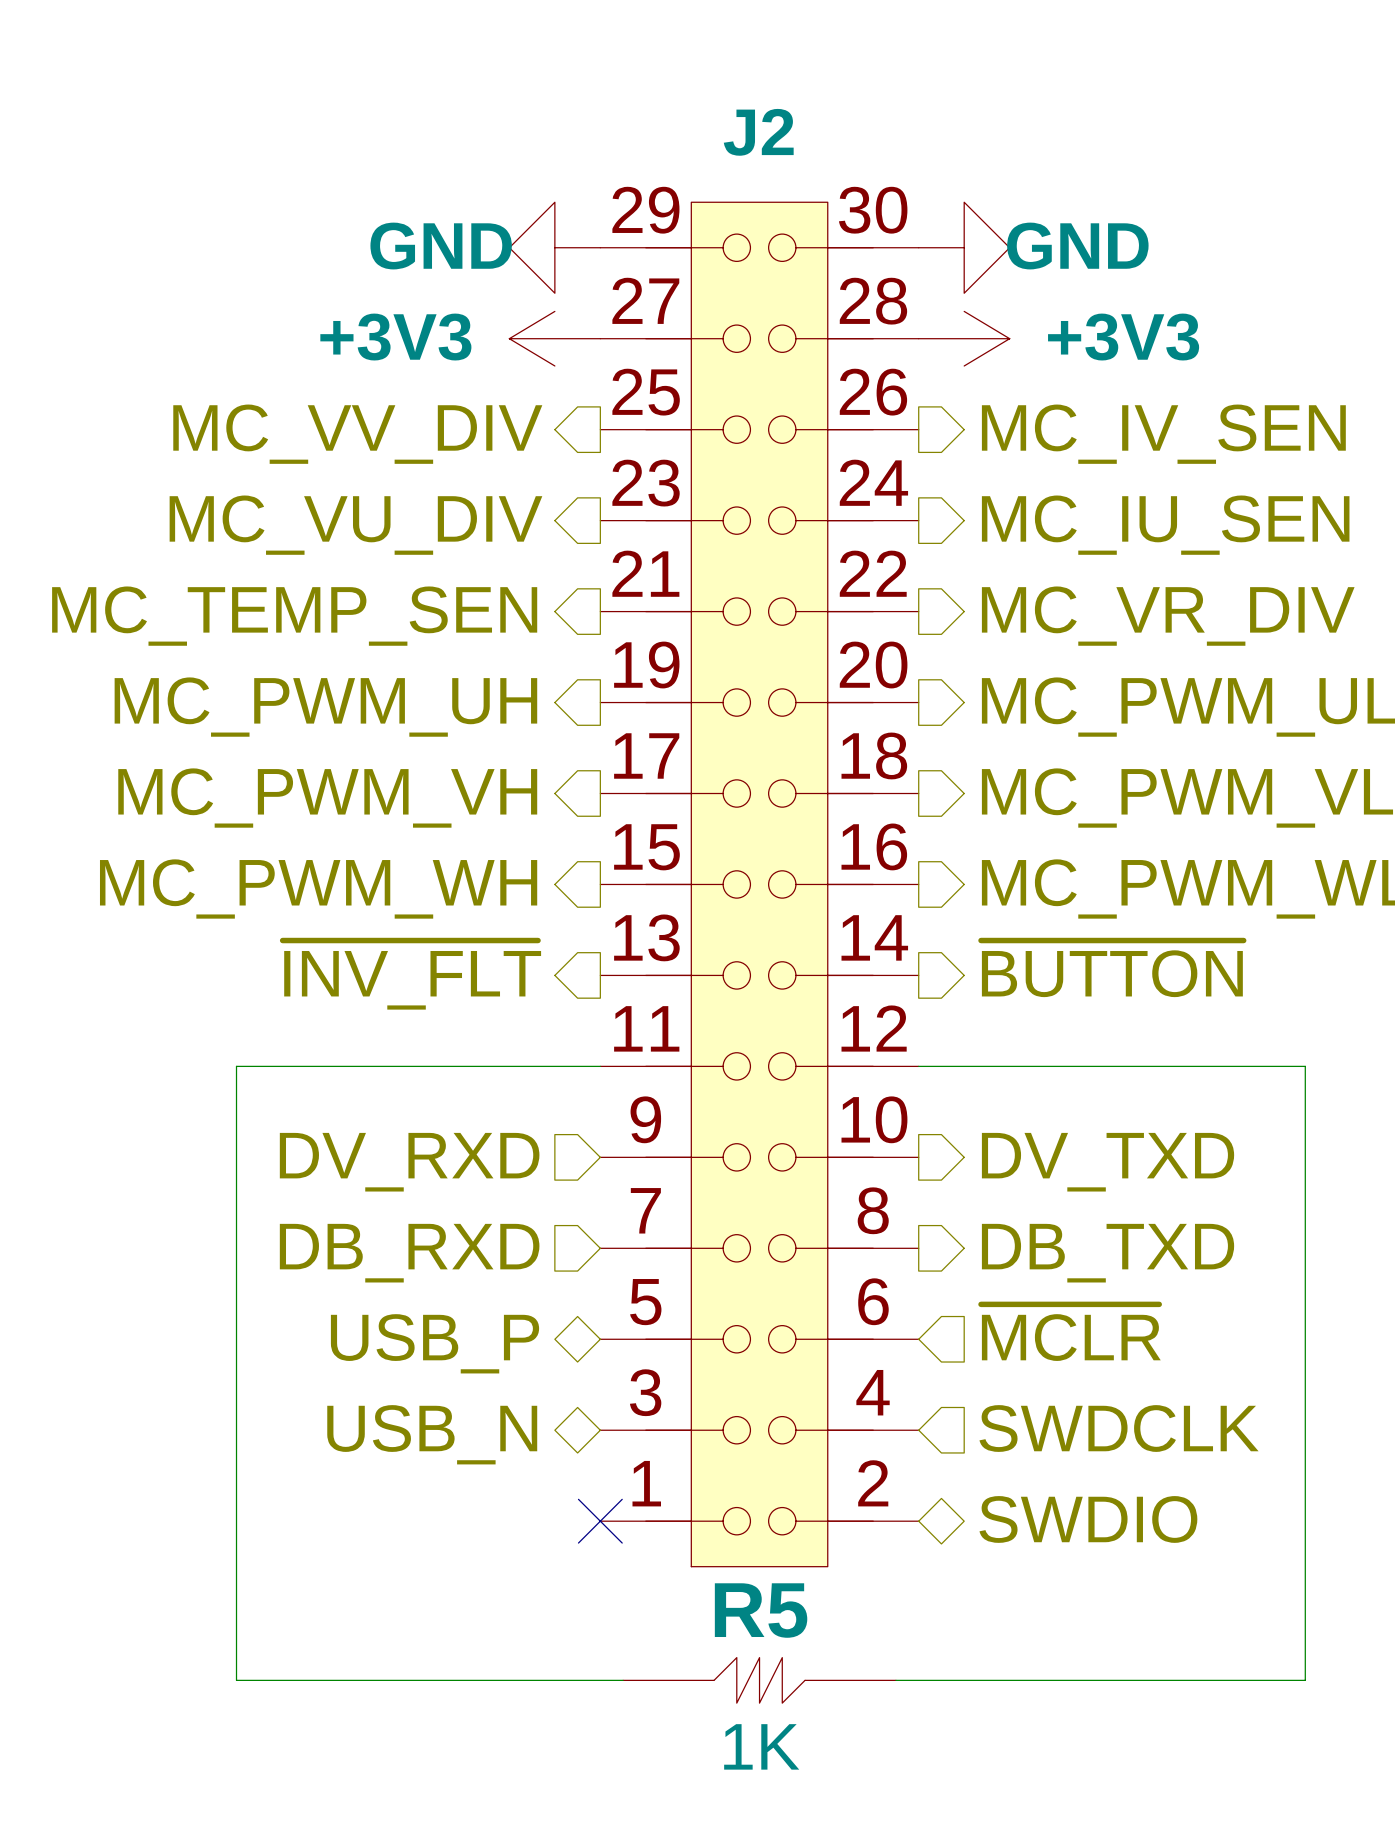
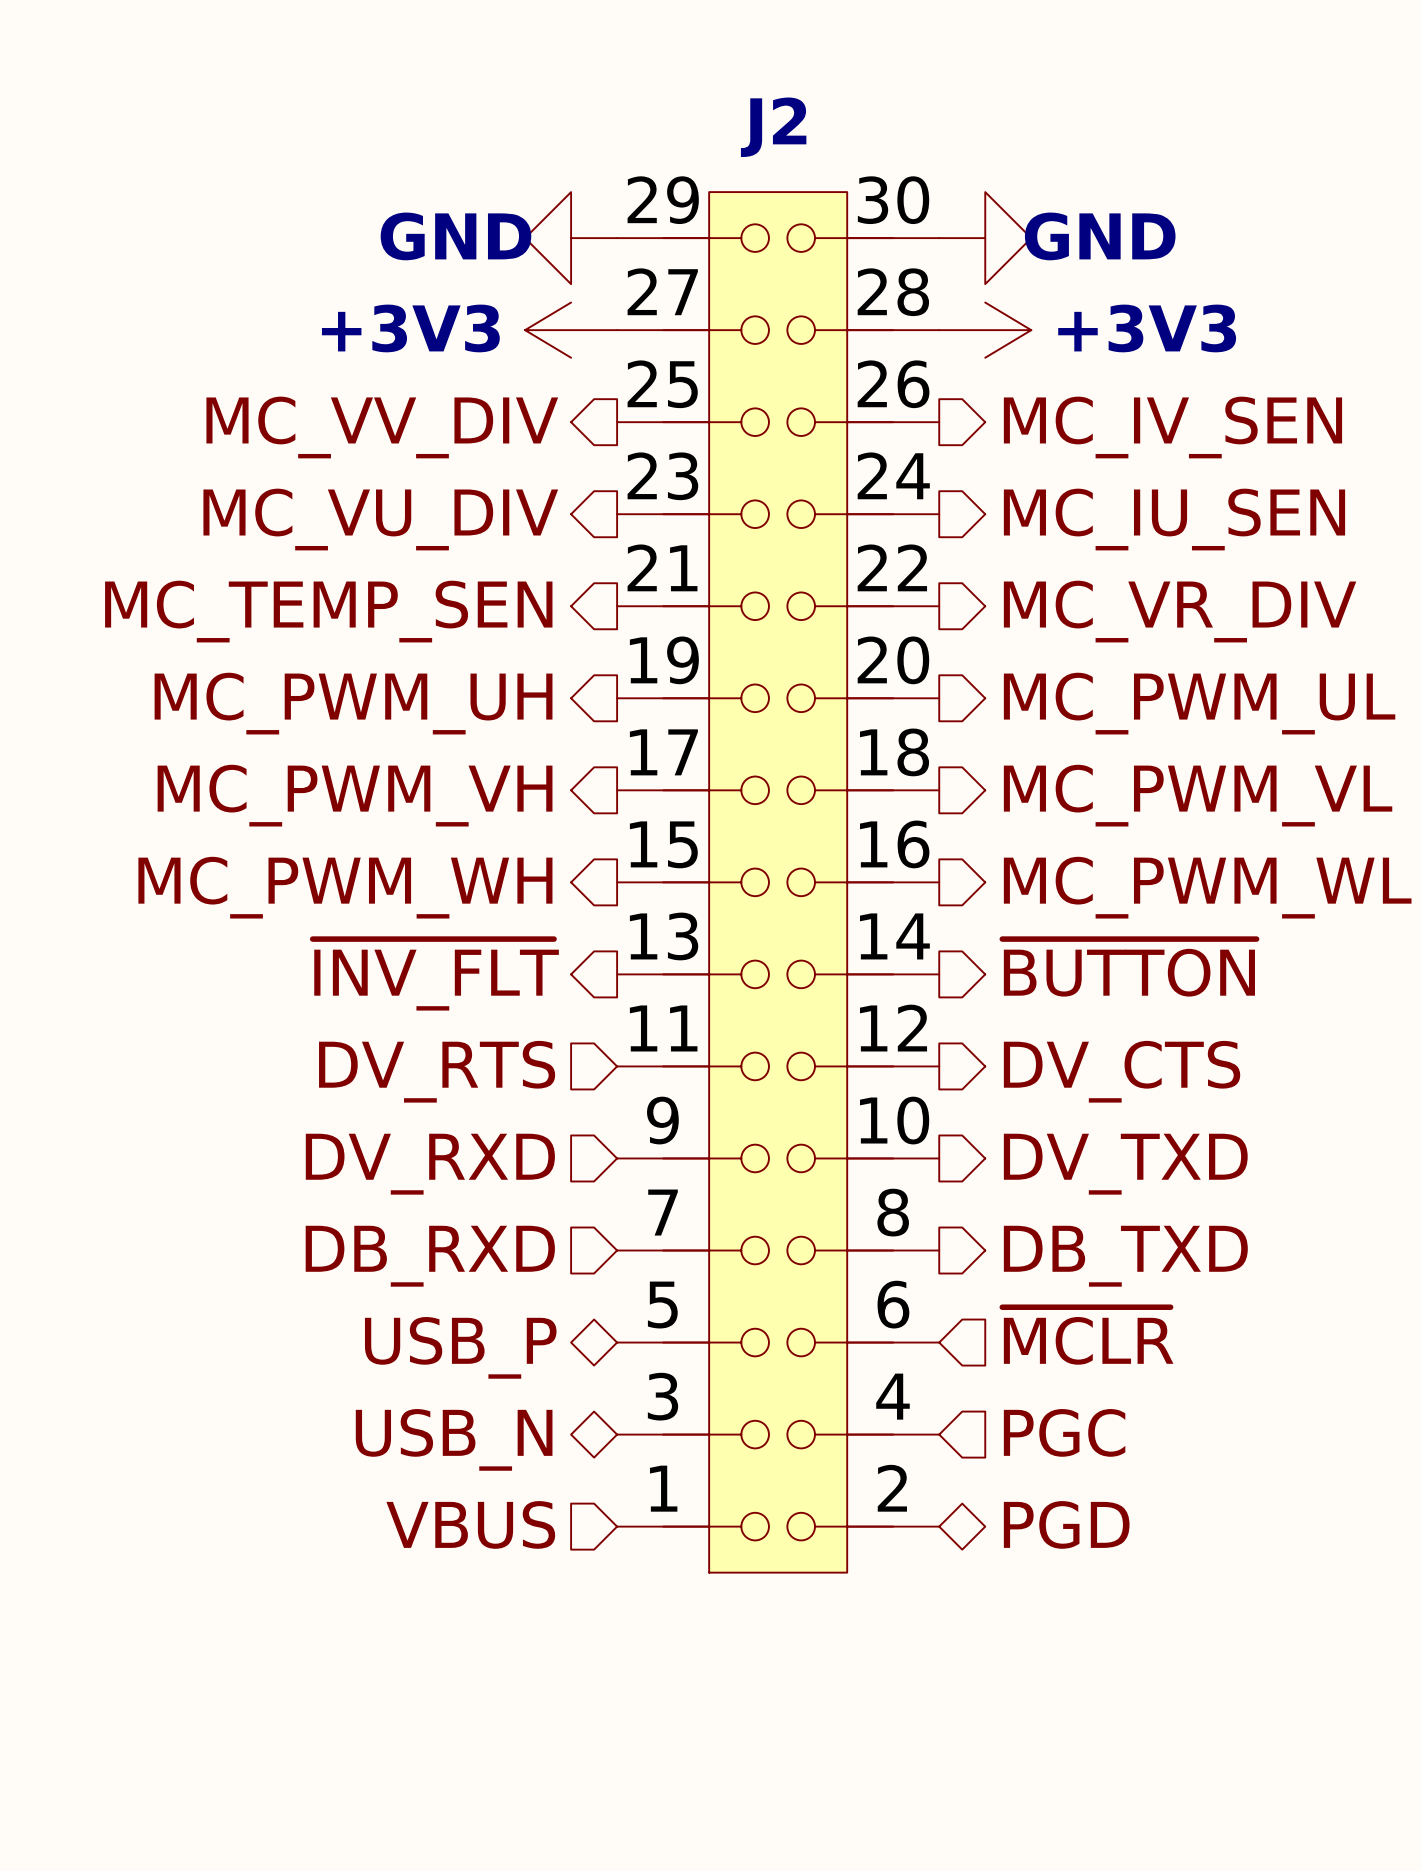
wire: (600, 1066) (236, 1066) (236, 1680) (623, 1680) -> none
wire: (918, 1066) (1305, 1066) (1305, 1680) (895, 1680) -> none
hierarchical label: none -> DV_RTS (437, 1071)
hierarchical label: none -> DV_CTS (1122, 1071)
hierarchical label: SWDCLK (1119, 1428) -> PGC (1064, 1432)
hierarchical label: none -> VBUS (470, 1524)
hierarchical label: SWDIO (1088, 1519) -> PGD (1066, 1524)
no-connect mark: (600, 1521) -> none
R5: 1K (759, 1680) -> none

